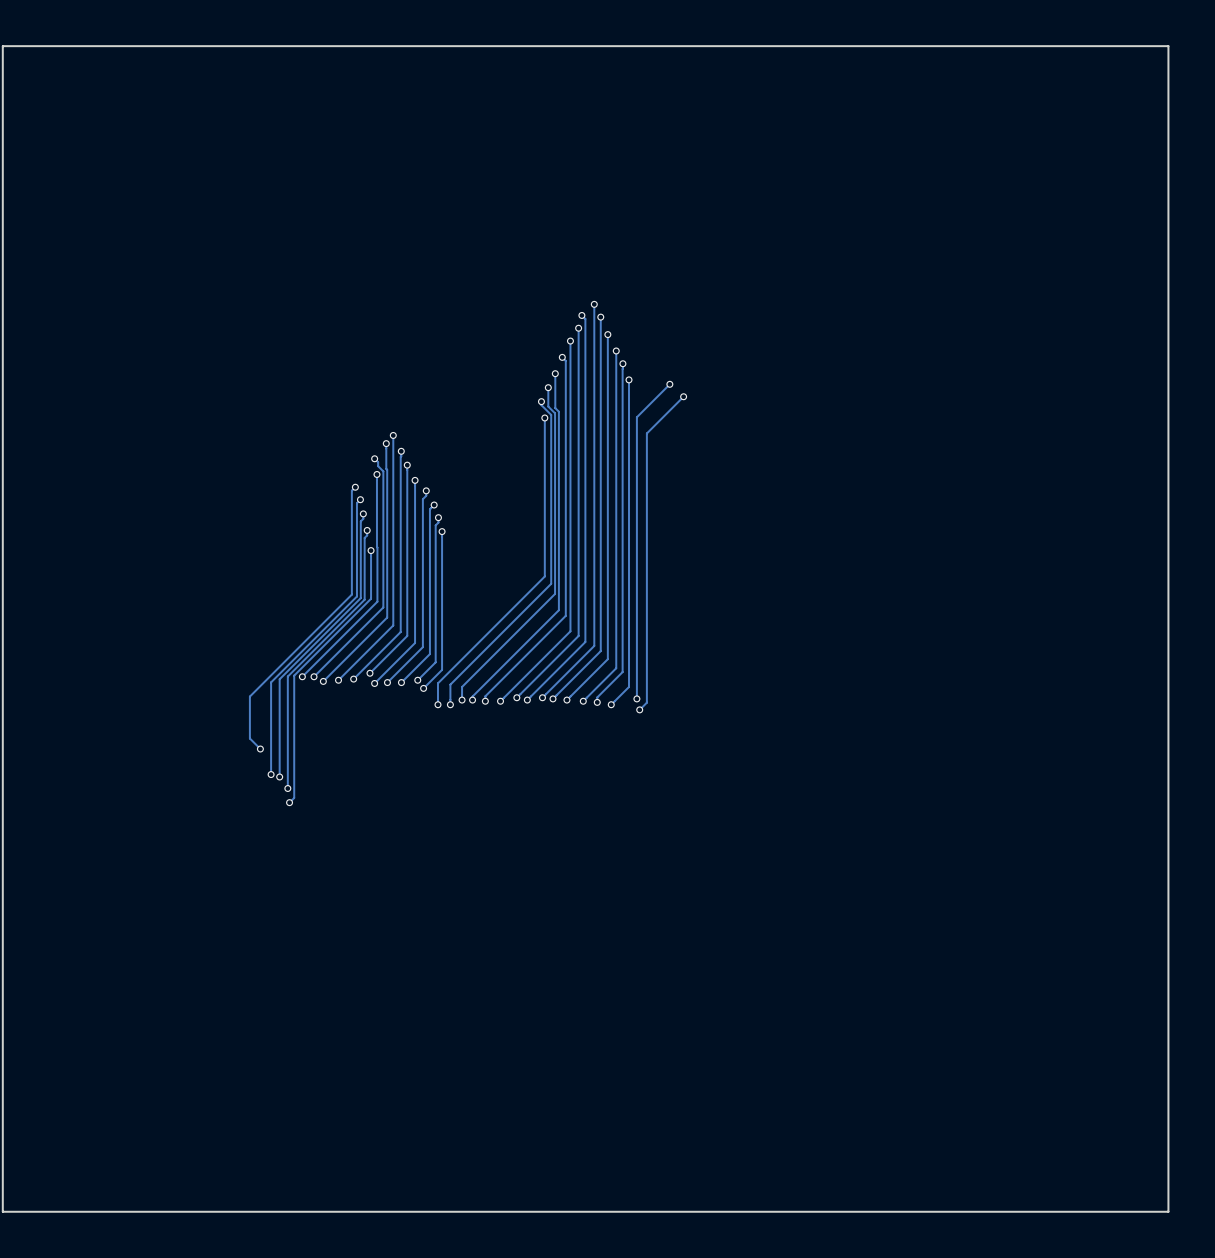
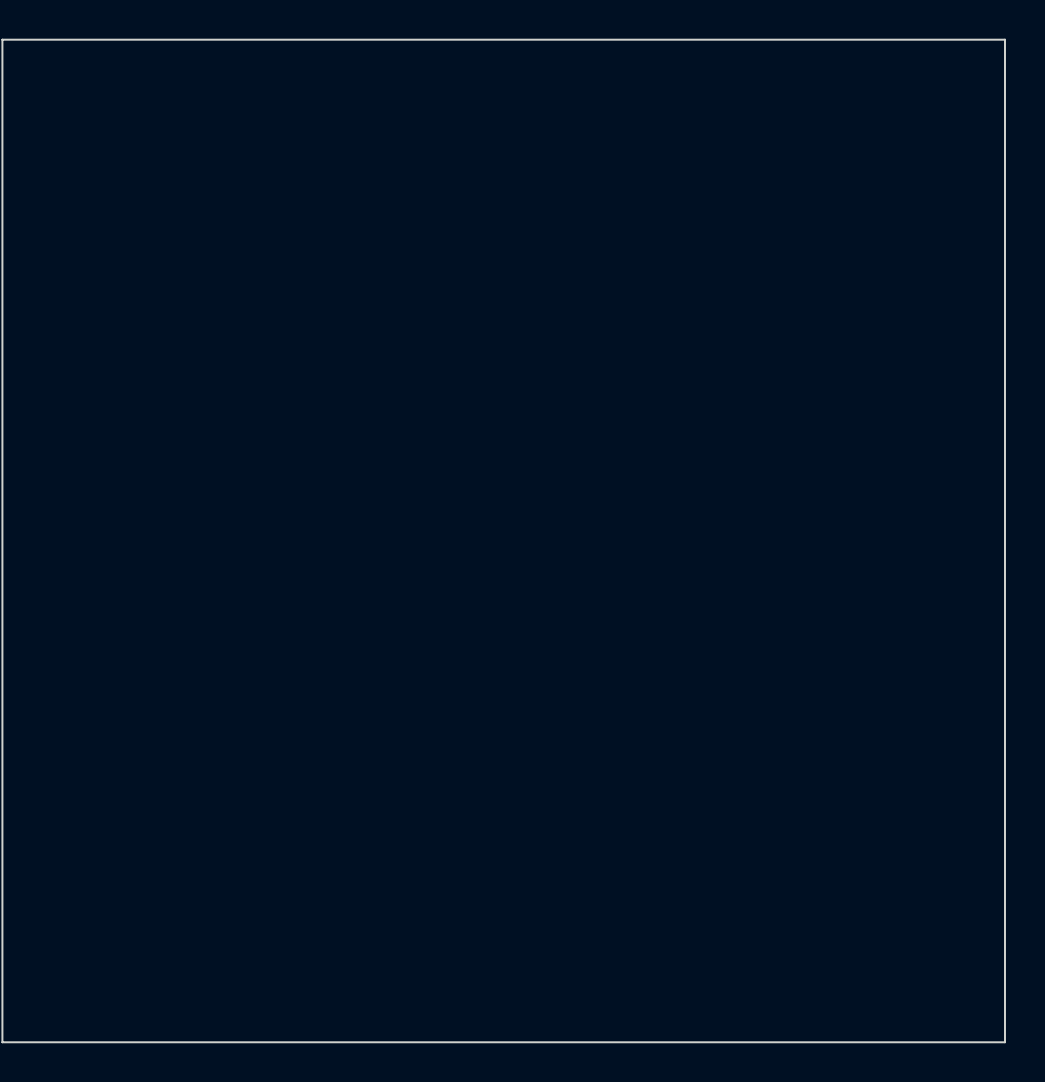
track: (594, 304) (594, 645) (542, 697) -> none
via: (594, 304) -> none
track: (581, 315) (585, 318) (585, 642) (527, 700) -> none
via: (581, 315) -> none
track: (600, 317) (600, 651) (552, 698) -> none
via: (600, 317) -> none
track: (578, 328) (578, 635) (516, 697) -> none
via: (578, 328) -> none
track: (607, 334) (607, 659) (566, 700) -> none
via: (607, 334) -> none
track: (570, 341) (570, 631) (500, 701) -> none
via: (570, 341) -> none
track: (616, 350) (616, 668) (583, 701) -> none
via: (616, 350) -> none
track: (562, 357) (565, 360) (565, 615) (485, 696) (485, 701) -> none
via: (562, 357) -> none
track: (622, 363) (622, 672) (597, 697) (597, 702) -> none
via: (622, 363) -> none
track: (555, 373) (555, 408) (558, 411) (558, 610) (472, 696) (472, 700) -> none
via: (555, 373) -> none
track: (629, 379) (629, 686) (611, 704) -> none
via: (629, 379) -> none
track: (669, 384) (636, 417) (636, 698) -> none
via: (669, 384) -> none
track: (548, 387) (548, 406) (555, 413) (555, 593) (462, 686) (462, 700) -> none
via: (548, 387) -> none
track: (683, 396) (646, 433) (646, 702) (639, 709) -> none
via: (683, 396) -> none
track: (541, 401) (541, 405) (551, 414) (551, 583) (450, 684) (450, 704) -> none
via: (541, 401) -> none
track: (544, 417) (544, 576) (437, 683) (437, 704) -> none
via: (544, 417) -> none
track: (393, 435) (393, 625) (338, 680) -> none
via: (393, 435) -> none
track: (386, 443) (387, 617) (323, 681) -> none
via: (386, 443) -> none
track: (401, 451) (400, 632) (353, 679) -> none
via: (401, 451) -> none
track: (374, 458) (383, 471) (383, 607) (314, 676) -> none
via: (374, 458) -> none
track: (407, 465) (407, 635) (369, 673) -> none
via: (407, 465) -> none
track: (376, 474) (377, 601) (302, 676) -> none
via: (376, 474) -> none
track: (415, 480) (415, 643) (374, 683) -> none
via: (415, 480) -> none
track: (355, 487) (351, 490) (351, 594) (249, 696) (249, 738) (260, 749) -> none
via: (355, 487) -> none
track: (426, 490) (426, 495) (422, 499) (422, 647) (387, 682) -> none
via: (426, 490) -> none
track: (360, 499) (356, 503) (356, 596) (271, 682) (271, 774) -> none
via: (360, 499) -> none
track: (434, 505) (429, 509) (429, 654) (401, 682) -> none
via: (434, 505) -> none
track: (363, 513) (363, 518) (360, 521) (360, 598) (279, 679) (279, 776) -> none
via: (363, 513) -> none
track: (438, 517) (438, 522) (435, 525) (435, 662) (417, 680) -> none
via: (438, 517) -> none
track: (367, 530) (367, 535) (364, 537) (364, 599) (287, 676) (287, 788) -> none
via: (367, 530) -> none
track: (442, 531) (442, 669) (423, 688) -> none
via: (442, 531) -> none
track: (371, 550) (371, 598) (294, 675) (294, 797) (289, 802) -> none
via: (371, 550) -> none
via: (369, 673) -> none
via: (302, 676) -> none
via: (314, 676) -> none
via: (353, 679) -> none
via: (338, 680) -> none
via: (417, 680) -> none
via: (323, 681) -> none
via: (387, 682) -> none
via: (401, 682) -> none
via: (374, 683) -> none
via: (423, 688) -> none
via: (516, 697) -> none
via: (542, 697) -> none
via: (552, 698) -> none
via: (636, 698) -> none
via: (462, 700) -> none
via: (472, 700) -> none
via: (527, 700) -> none
via: (566, 700) -> none
via: (485, 701) -> none
via: (500, 701) -> none
via: (583, 701) -> none
via: (597, 702) -> none
via: (437, 704) -> none
via: (450, 704) -> none
via: (611, 704) -> none
via: (639, 709) -> none
via: (260, 749) -> none
via: (271, 774) -> none
via: (279, 776) -> none
via: (287, 788) -> none
via: (289, 802) -> none

